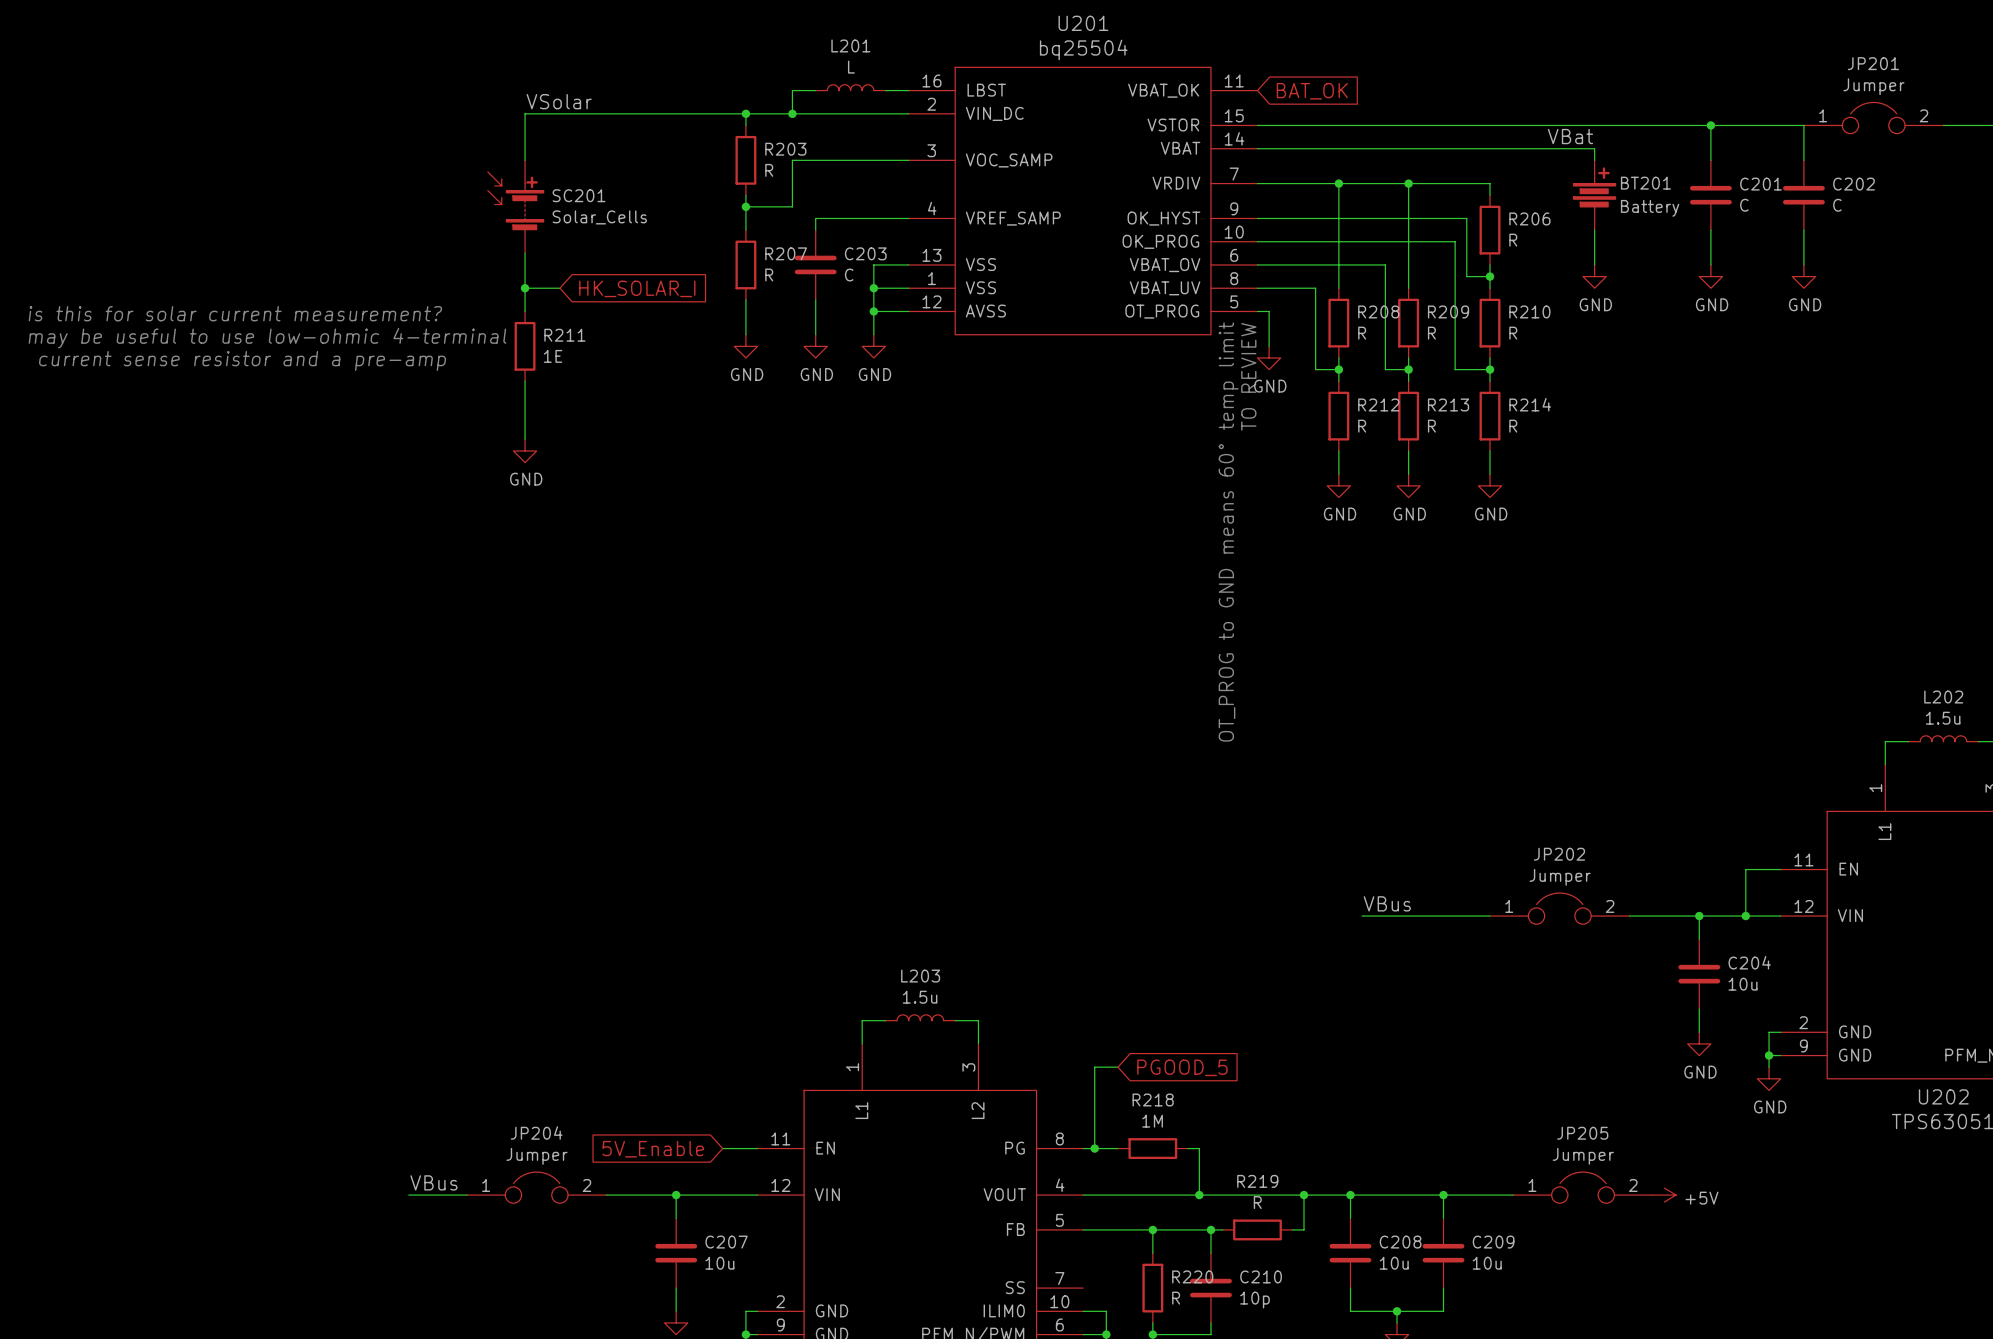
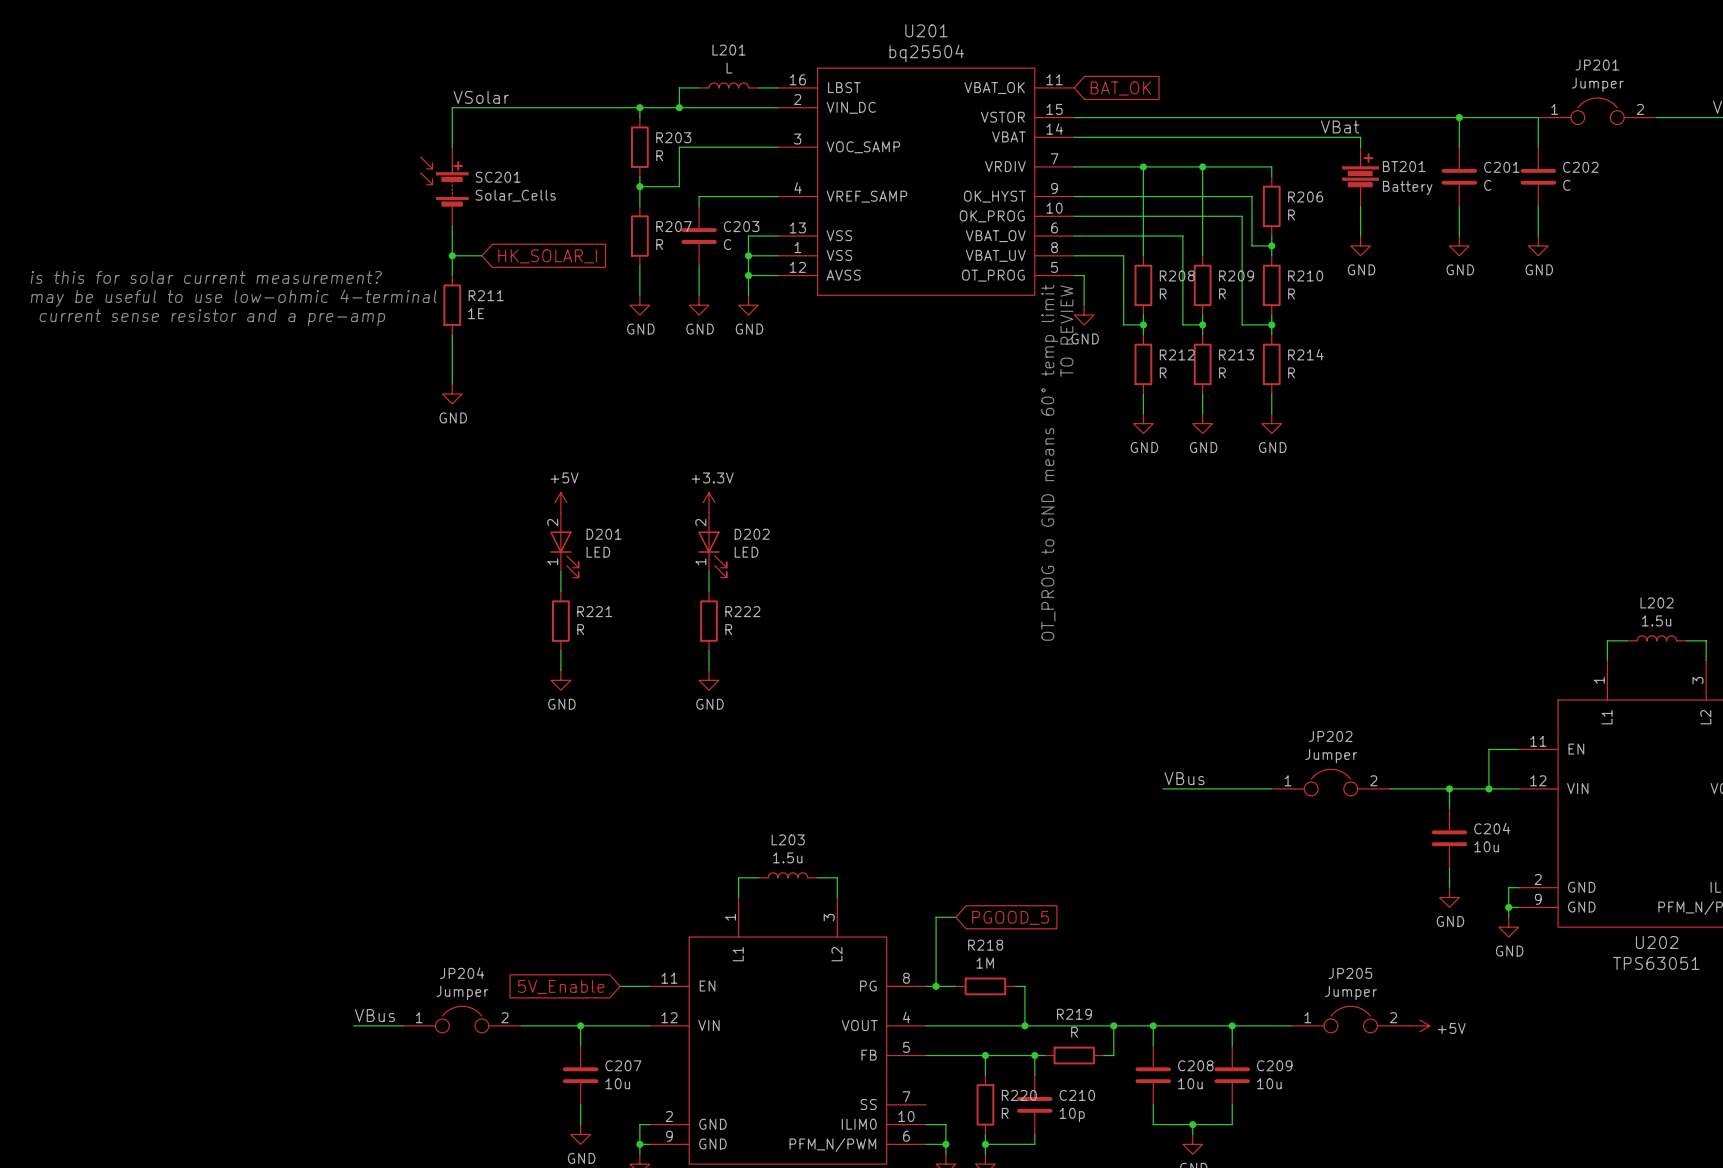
power symbol: none -> +5V (560, 502)
power symbol: none -> +3.3V (708, 502)
D201: none -> LED (564, 545)
D202: none -> LED (712, 545)
wire: none -> (560, 571) (560, 591)
wire: none -> (708, 571) (708, 591)
R221: none -> R (560, 621)
R222: none -> R (708, 621)
wire: none -> (560, 650) (560, 670)
wire: none -> (708, 650) (708, 670)
power symbol: none -> GND (560, 680)
power symbol: none -> GND (708, 680)

